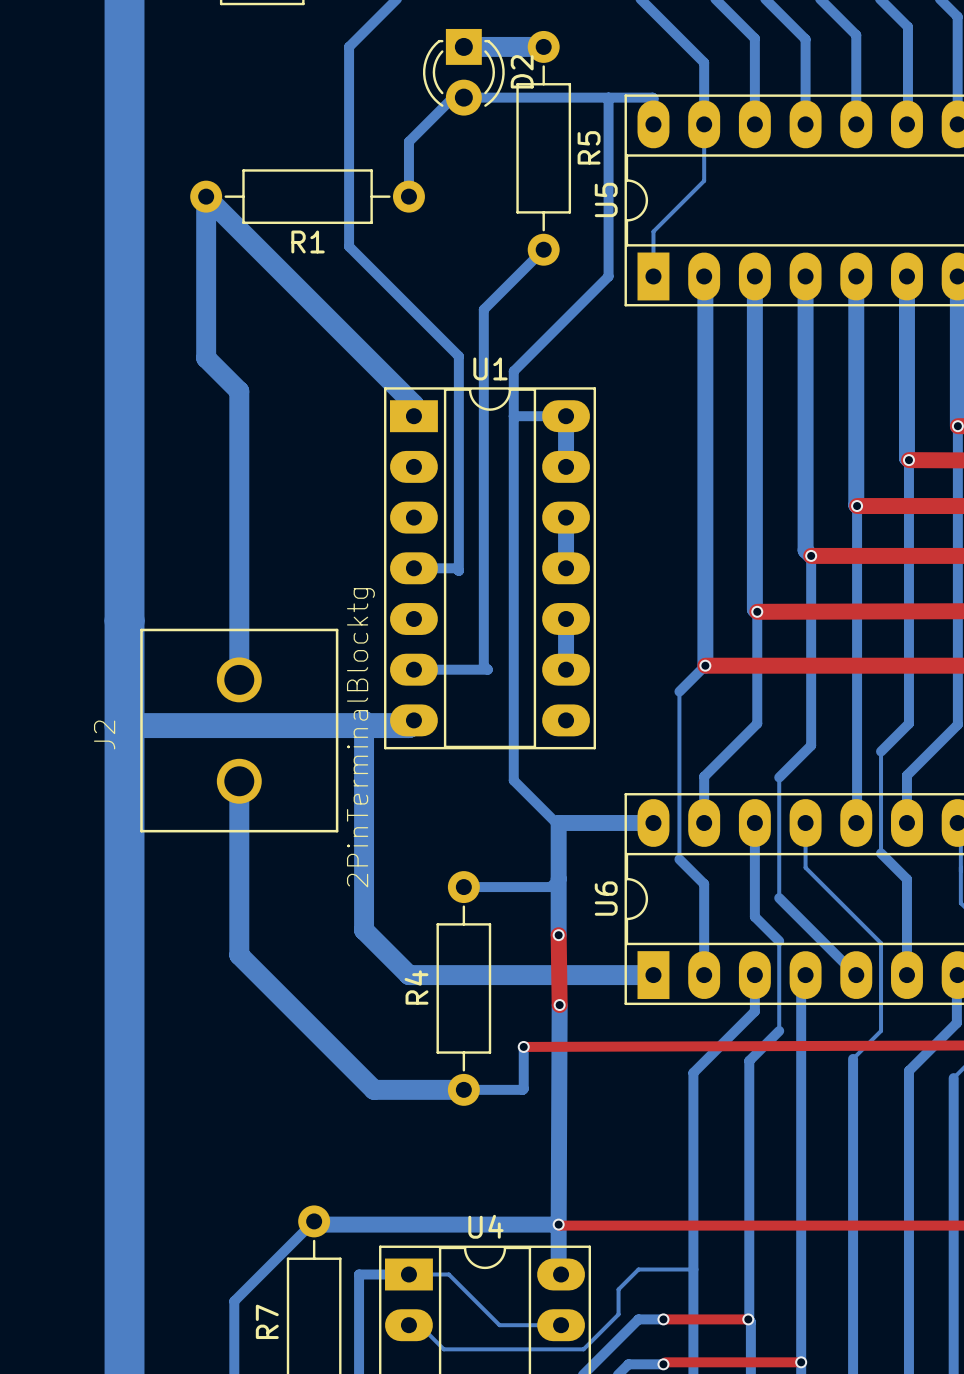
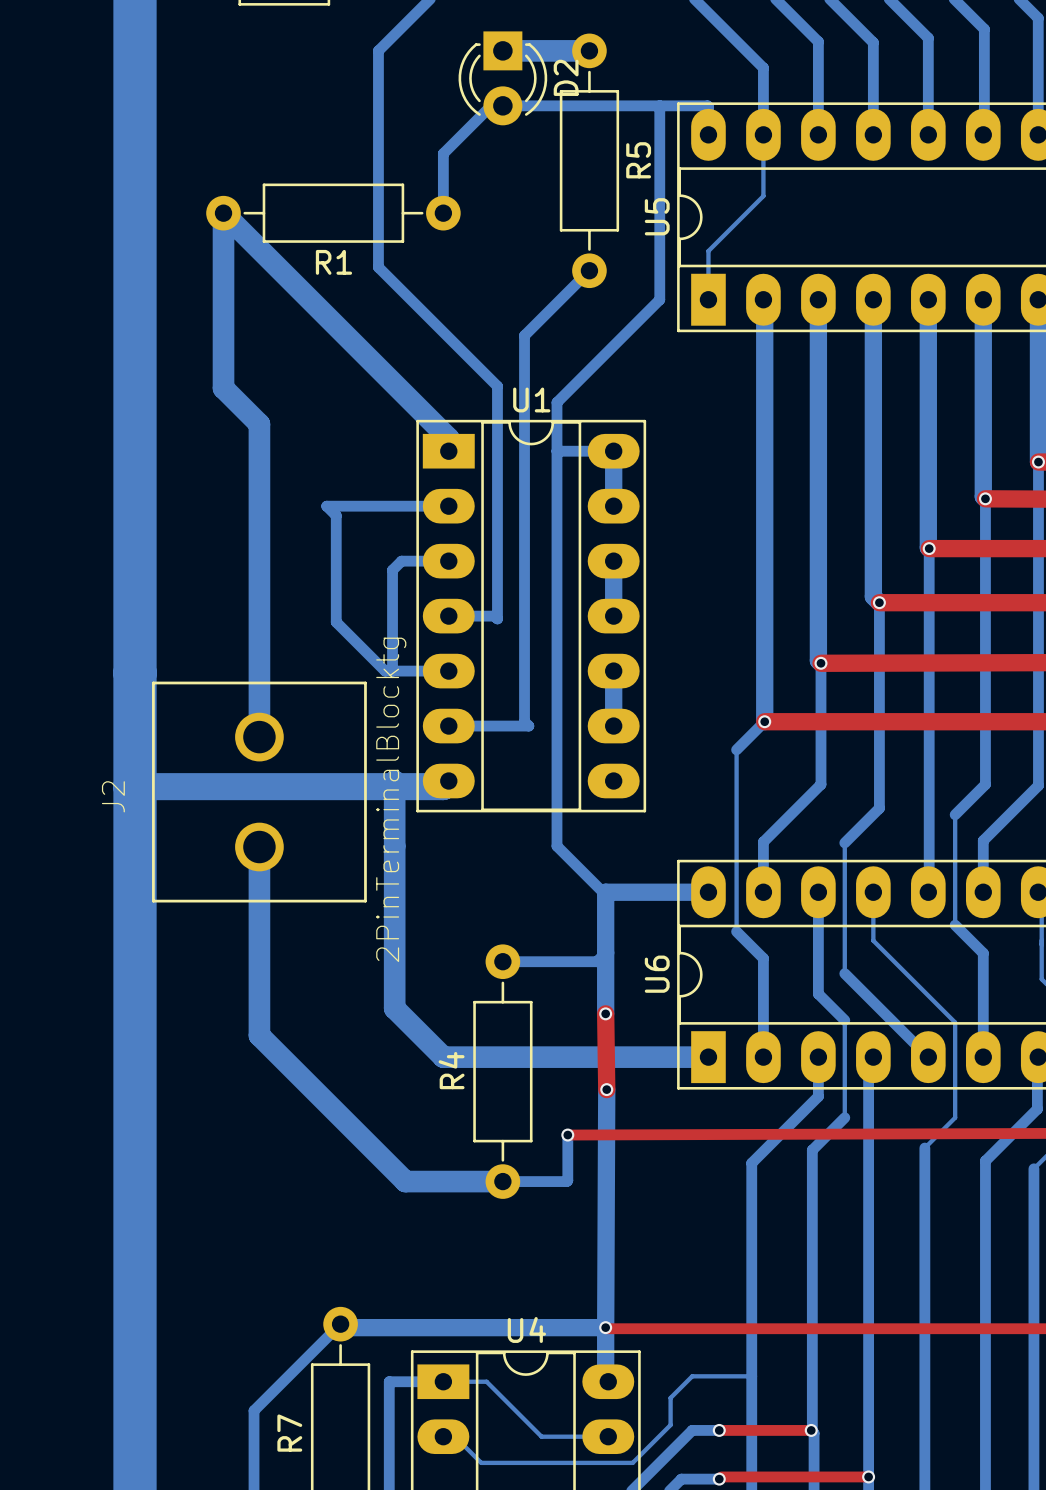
bottom track: none -> (448, 506) (326, 506) (336, 515) (336, 622) (385, 671) (448, 671)
bottom track: none -> (448, 561) (401, 561) (392, 570) (392, 671)

